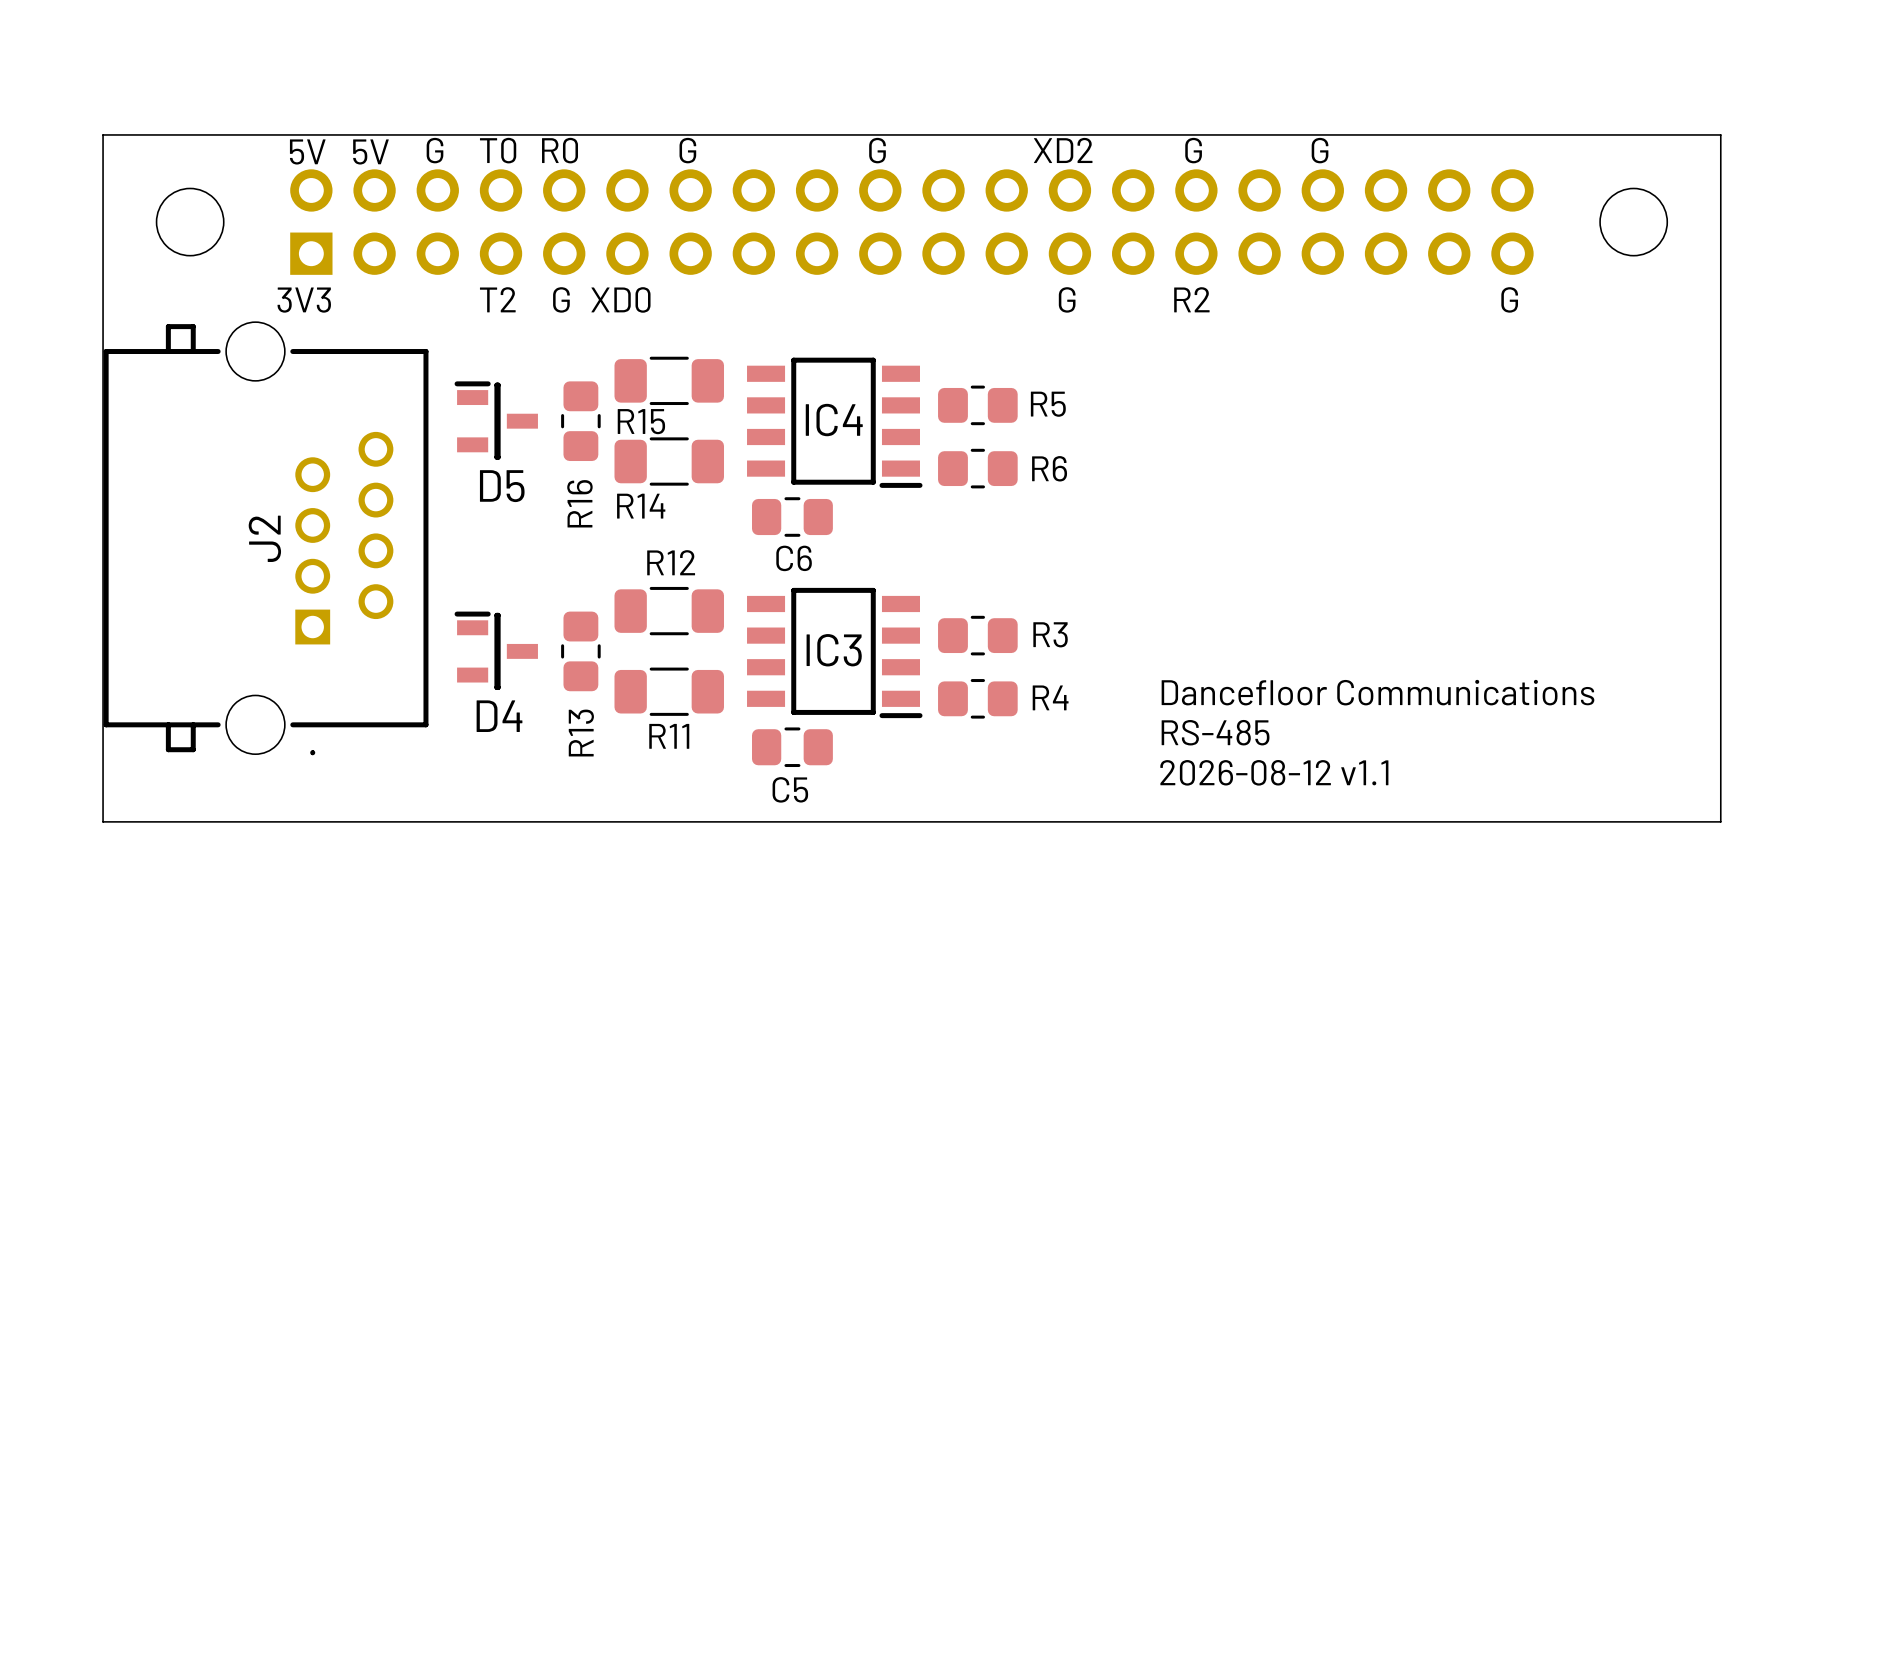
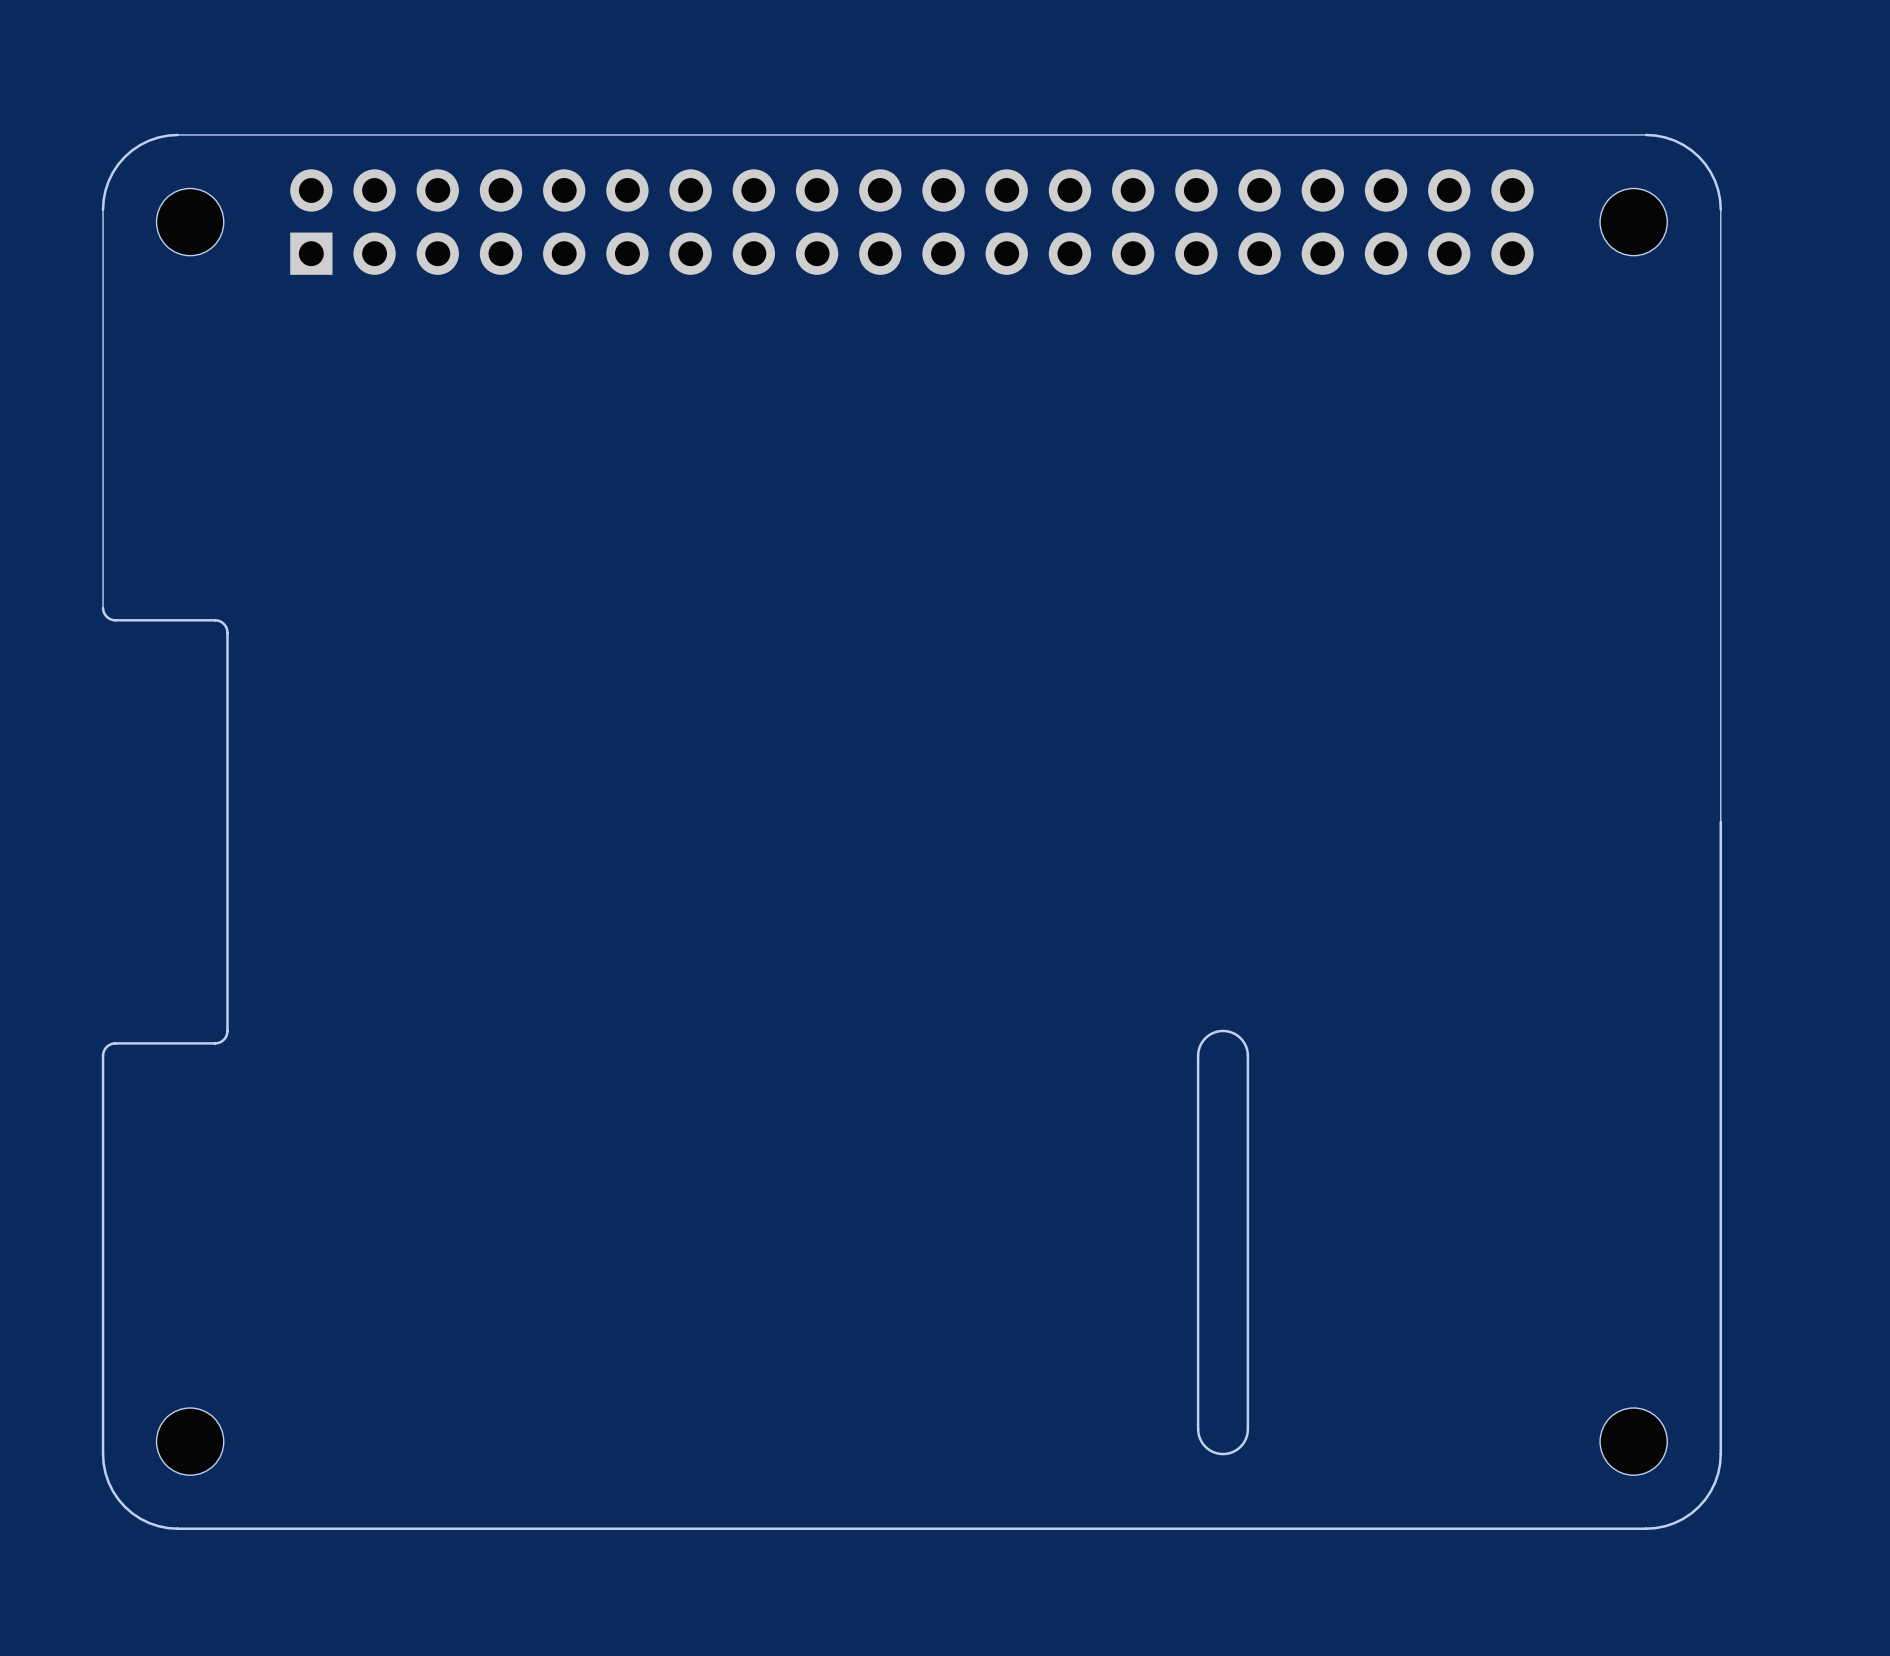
board edge: (177, 134) (103, 134) (103, 209) -> (177, 134) (149, 140) (124, 156) (108, 181) (103, 209)
board edge: (1646, 134) (1720, 134) (1720, 209) -> (1646, 134) (1674, 140) (1698, 156) (1715, 181) (1720, 209)
text: G (434, 150) -> none
text: T0 (498, 150) -> none
text: R0 (560, 150) -> none
text: G (687, 150) -> none
text: G (877, 150) -> none
text: XD2 (1063, 150) -> none
text: G (1193, 150) -> none
text: G (1320, 150) -> none
text: 5V (307, 151) -> none
text: 5V (371, 151) -> none
text: T2 (497, 299) -> none
text: G (561, 299) -> none
text: XD0 (620, 299) -> none
text: G (1067, 299) -> none
text: R2 (1191, 299) -> none
text: G (1509, 299) -> none
text: 3V3 (304, 300) -> none
R15: (669, 380) -> none
R5: (977, 405) -> none
D5: (496, 420) -> none
R16: (580, 421) -> none
IC4: (834, 422) -> none
R14: (669, 461) -> none
R6: (977, 468) -> none
C6: (792, 517) -> none
J2: (266, 538) -> none
board edge: (103, 607) (103, 821) (1720, 821) -> (103, 607) (105, 615) (113, 620) (216, 620) (223, 623) (227, 631) (227, 1034) (223, 1039) (216, 1043) (113, 1043) (106, 1047) (103, 1054) (103, 1463) (108, 1482) (124, 1506) (140, 1518) (167, 1528) (1646, 1528) (1674, 1523) (1691, 1513) (1705, 1499) (1715, 1482) (1720, 1463) (1720, 821)
R12: (669, 611) -> none
R3: (977, 635) -> none
D4: (496, 650) -> none
R13: (580, 651) -> none
IC3: (834, 653) -> none
R11: (669, 691) -> none
text: Dancefloor Communications (1377, 692) -> none
R4: (977, 698) -> none
text: RS-485 (1215, 732) -> none
C5: (792, 747) -> none
text: 2026-08-12 v1.1 (1274, 772) -> none
board edge: none -> (1198, 1055) (1198, 1432) (1201, 1441) (1207, 1448) (1216, 1453) (1226, 1453) (1235, 1450) (1242, 1444) (1247, 1429) (1247, 1052) (1240, 1038) (1232, 1032) (1223, 1030) (1213, 1032) (1205, 1038) (1200, 1046) (1198, 1055)
part: none -> (190, 1441)
part: none -> (1633, 1441)

